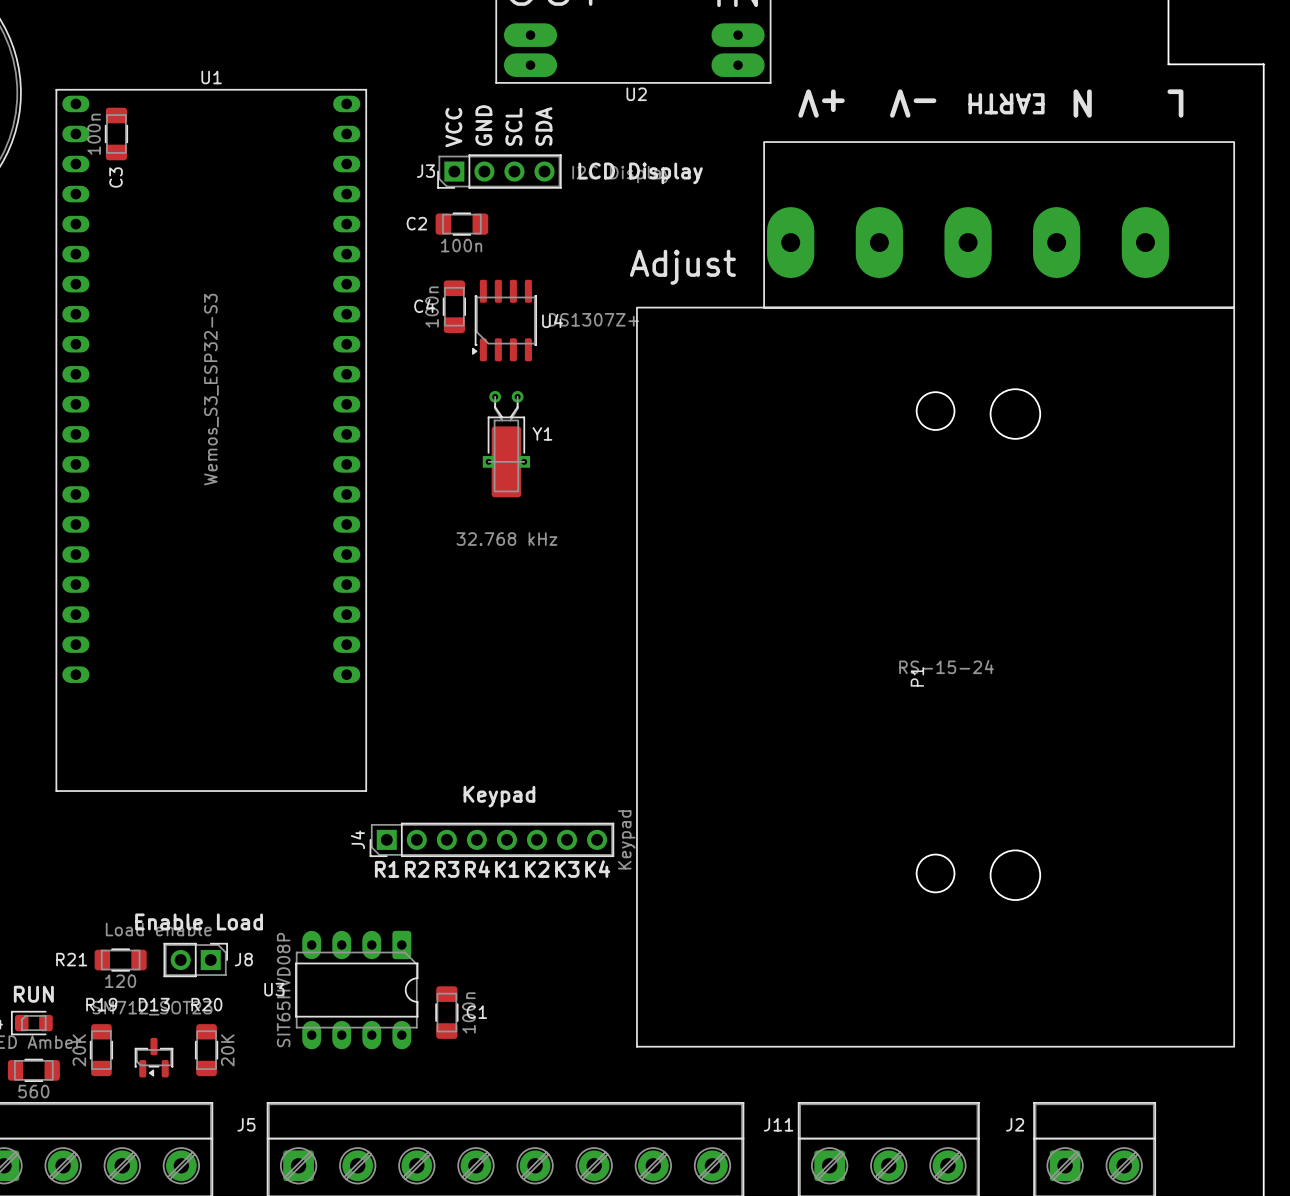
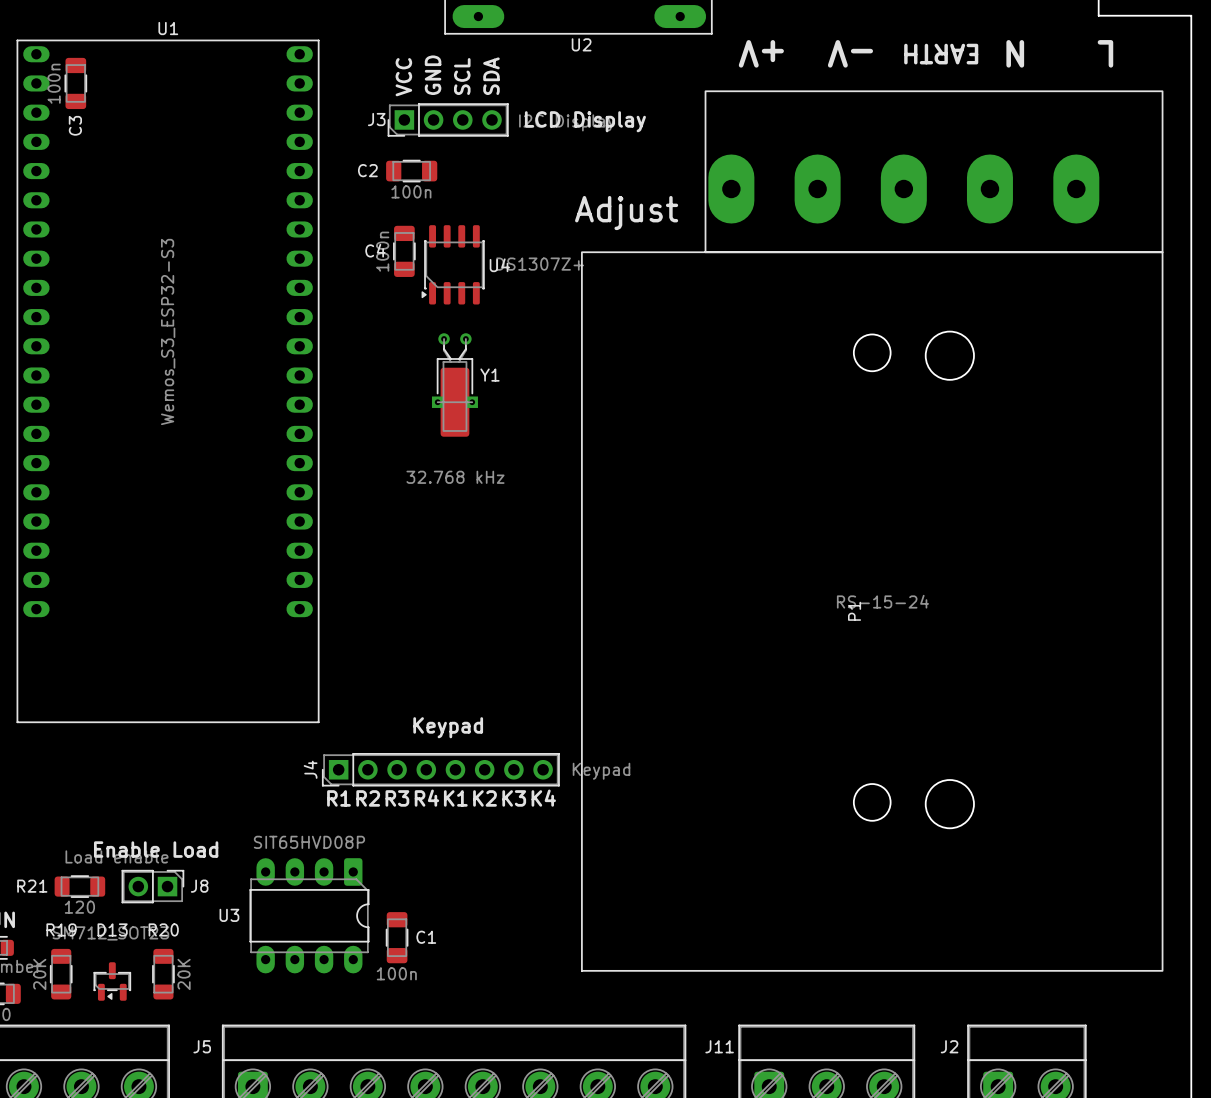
J4 value rotation: 0° (626, 839) -> 90° clockwise (601, 771)
U3 value rotation: 0° (283, 990) -> 90° clockwise (309, 842)
C1 value rotation: 0° (468, 1012) -> 90° clockwise (396, 973)

